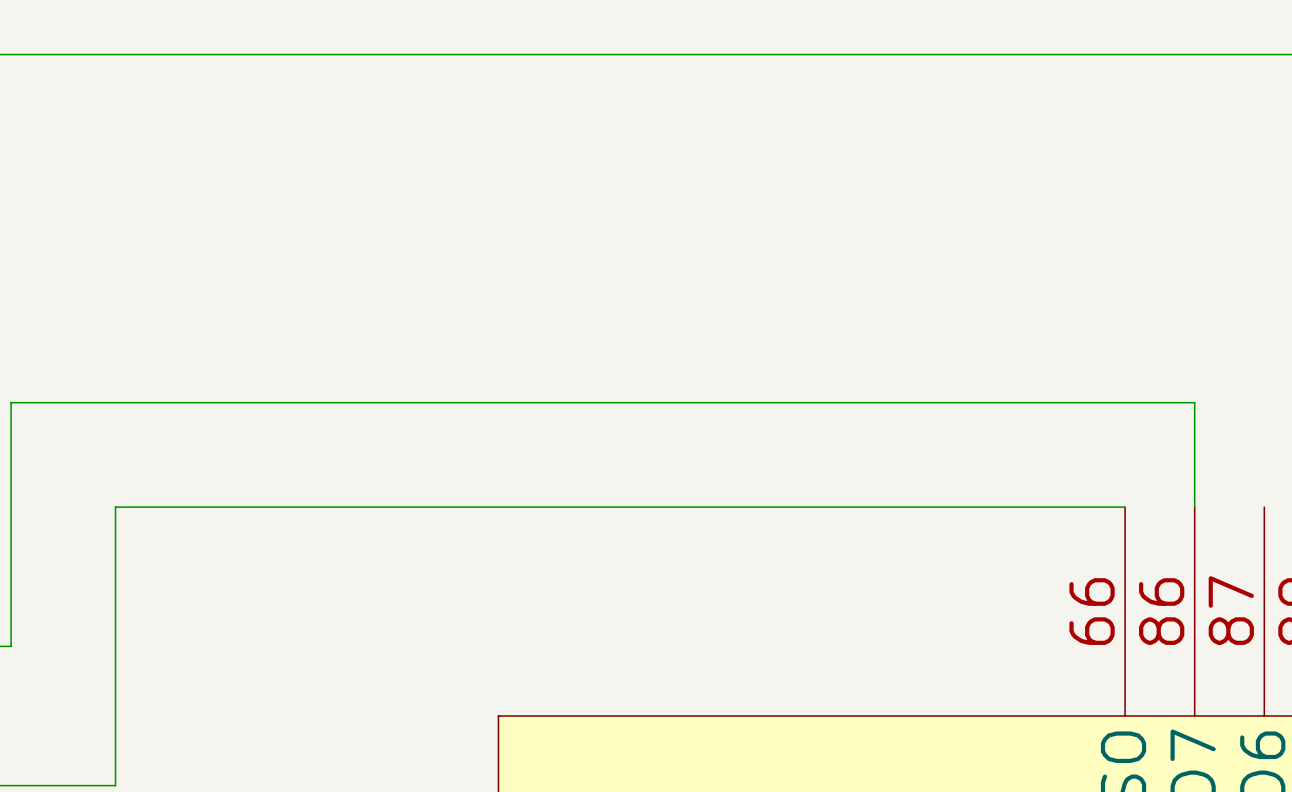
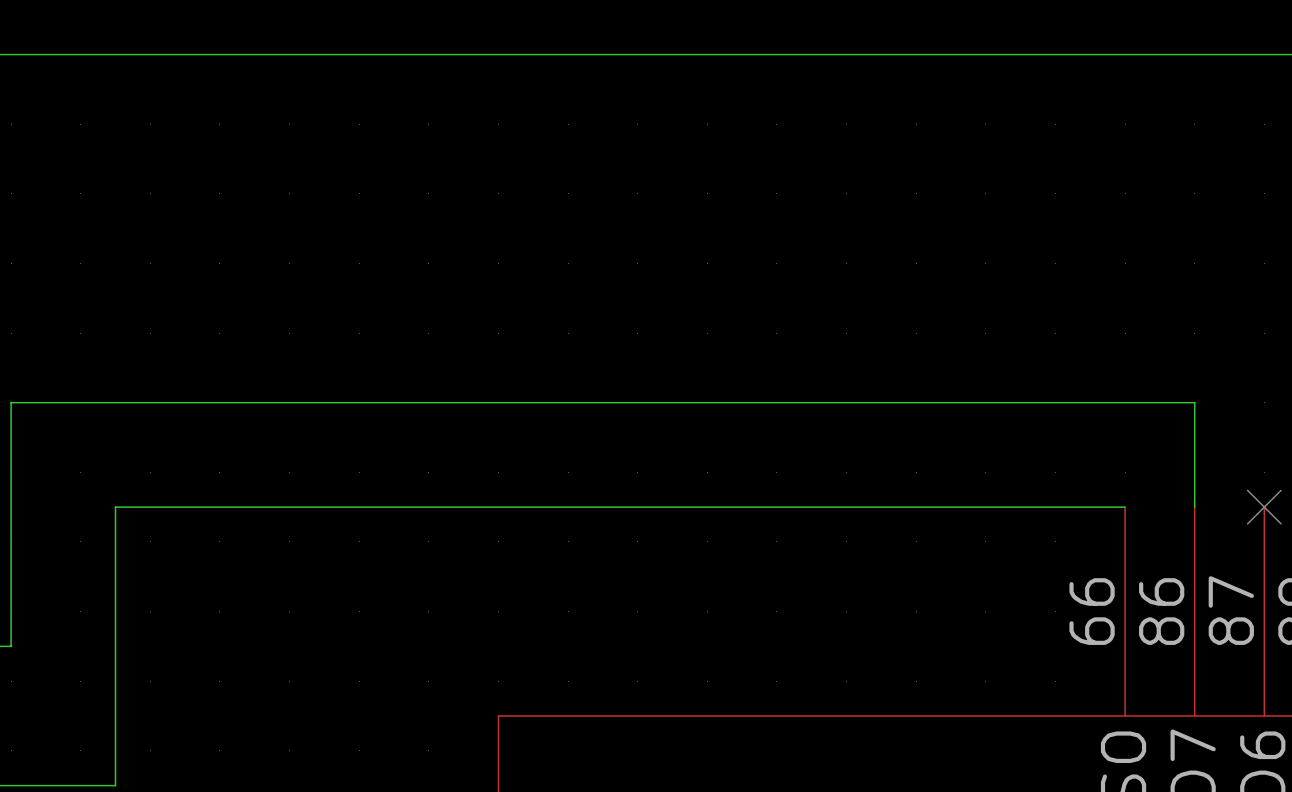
no-connect mark: none -> (1264, 507)

